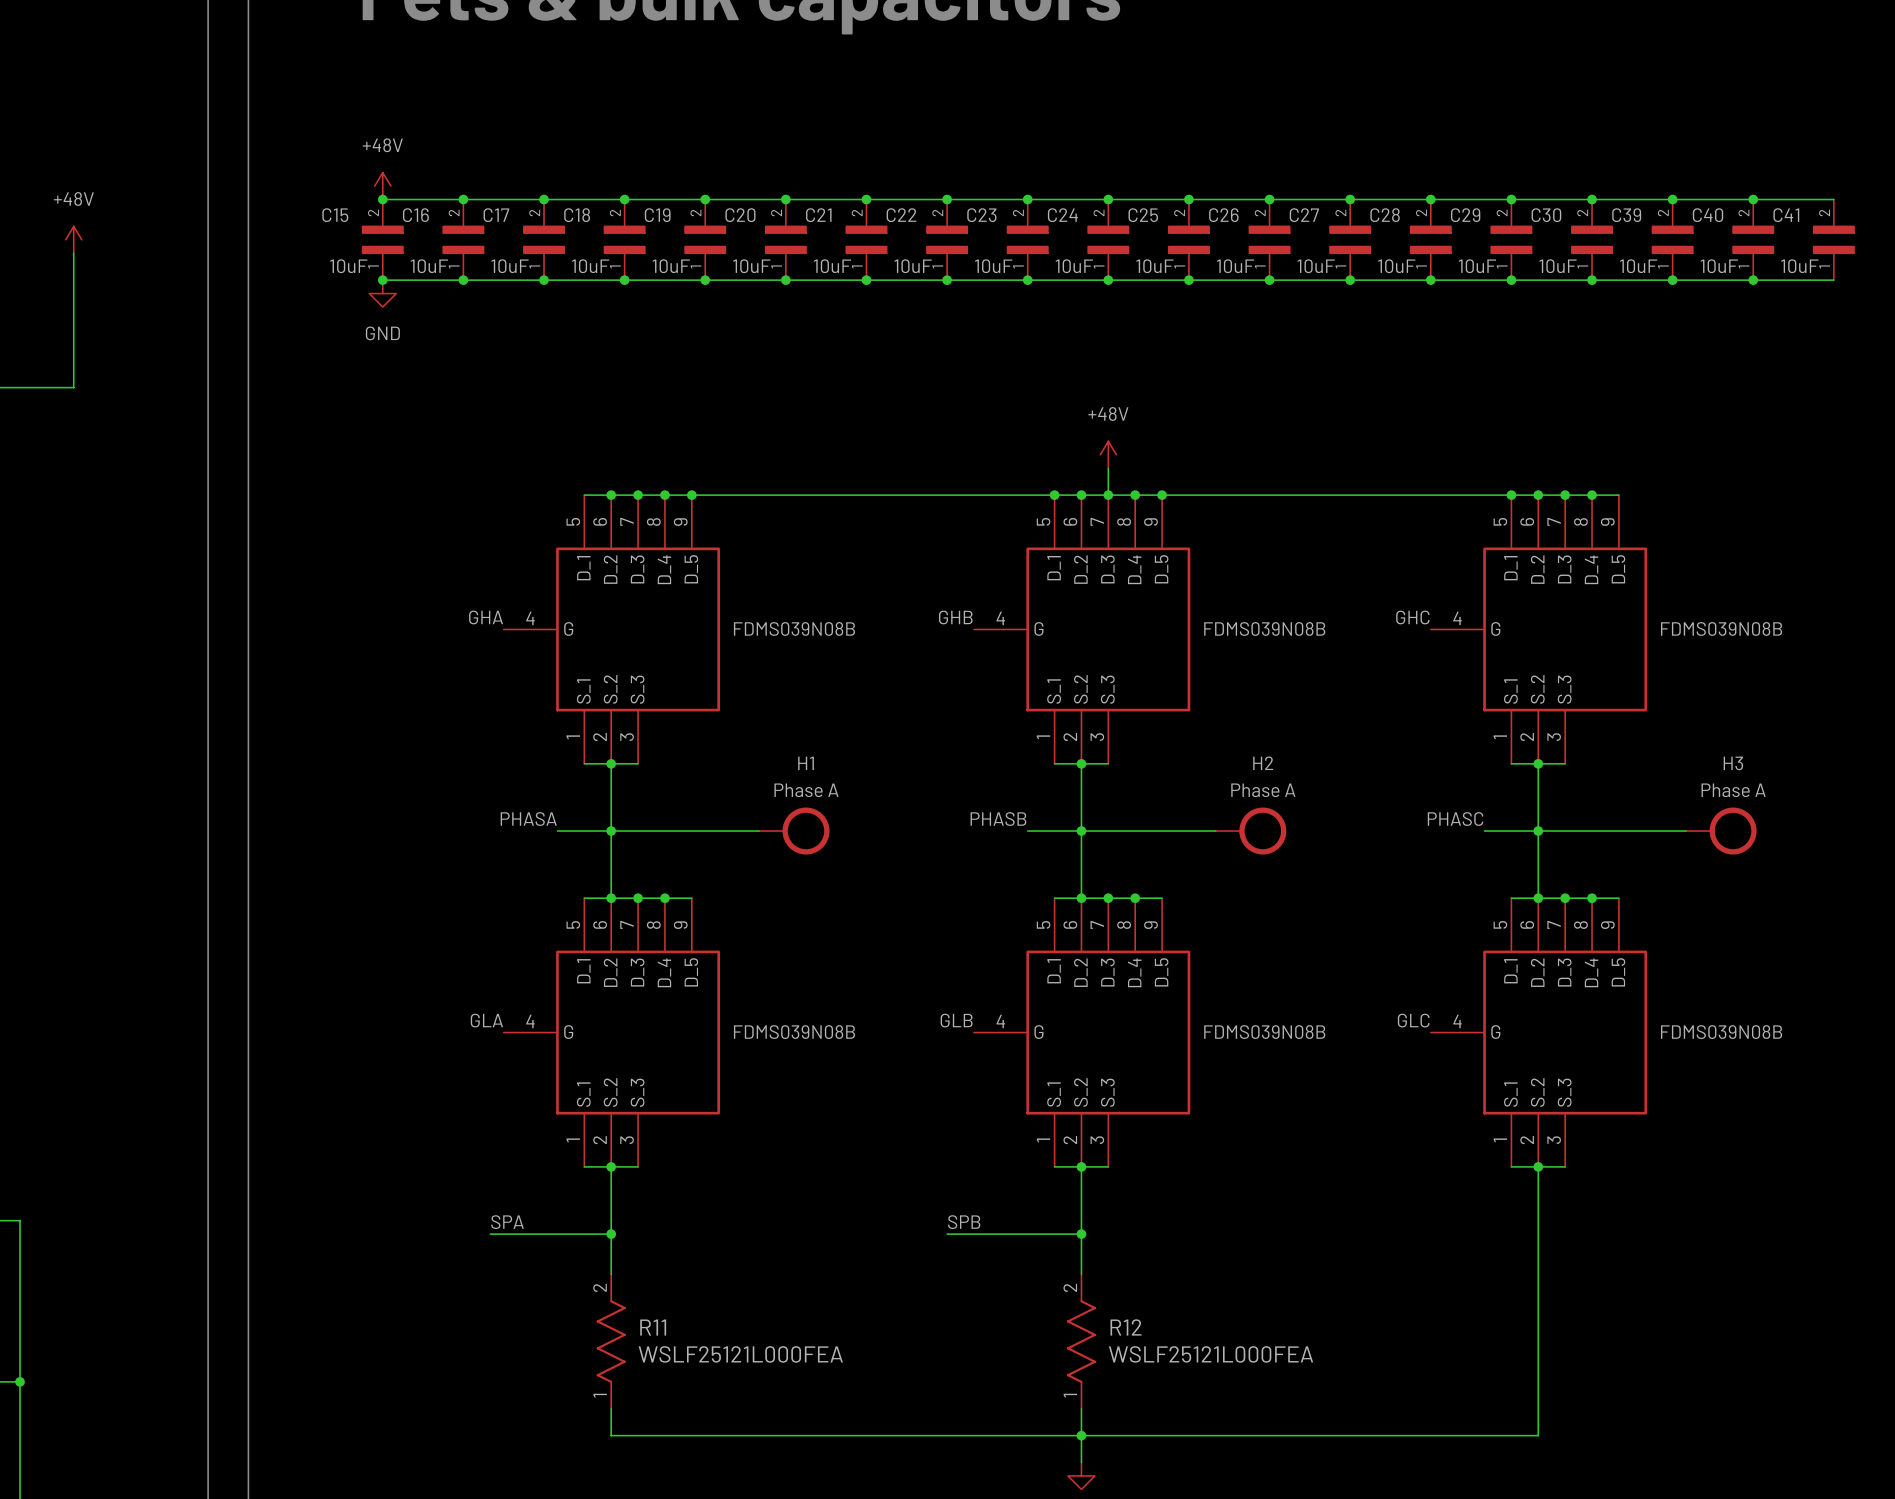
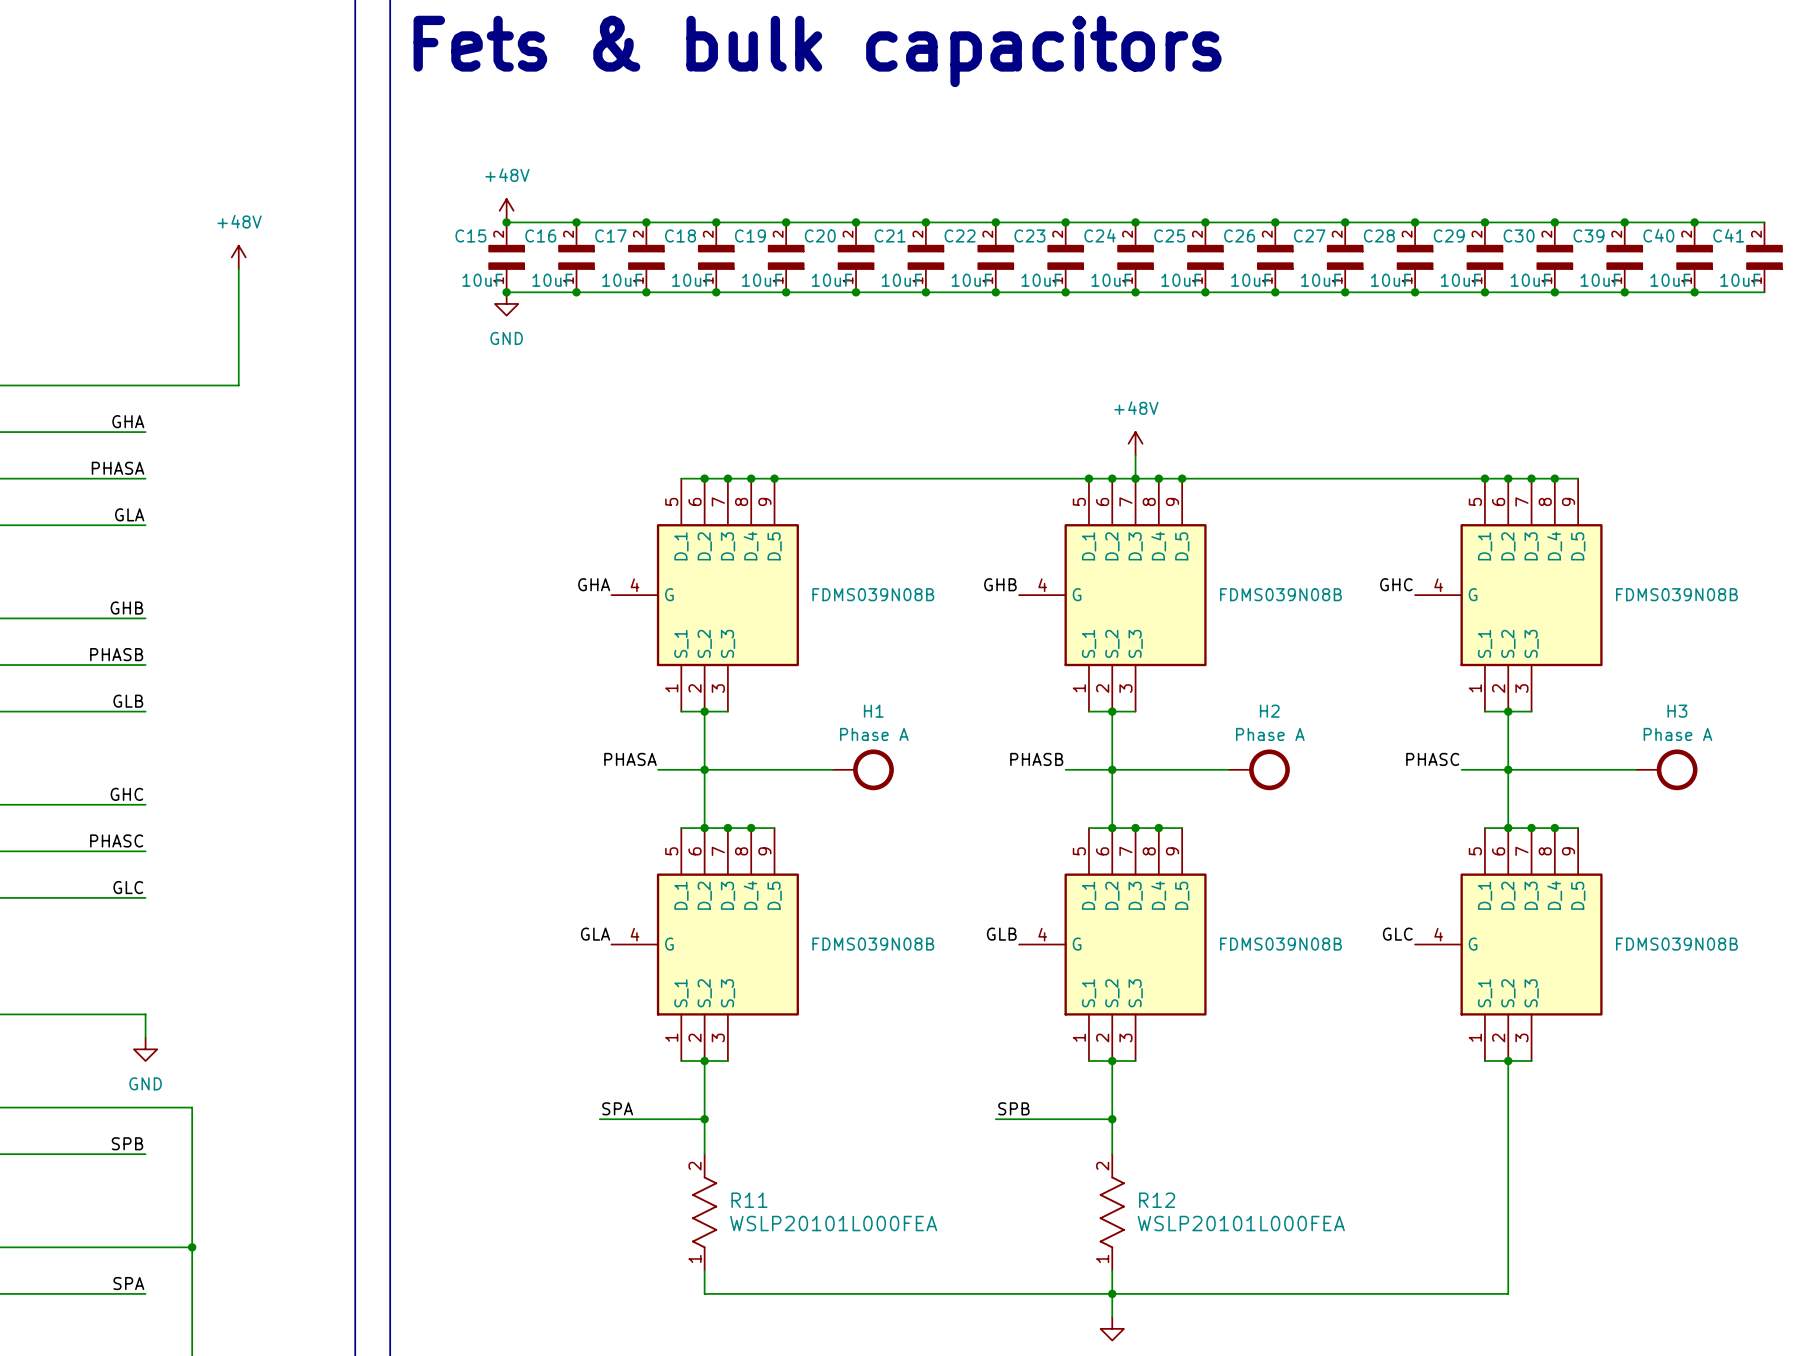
R11 value: WSLF25121L000FEA (740, 1354) -> WSLP20101L000FEA (833, 1223)
R12 value: WSLF25121L000FEA (1211, 1354) -> WSLP20101L000FEA (1241, 1223)

